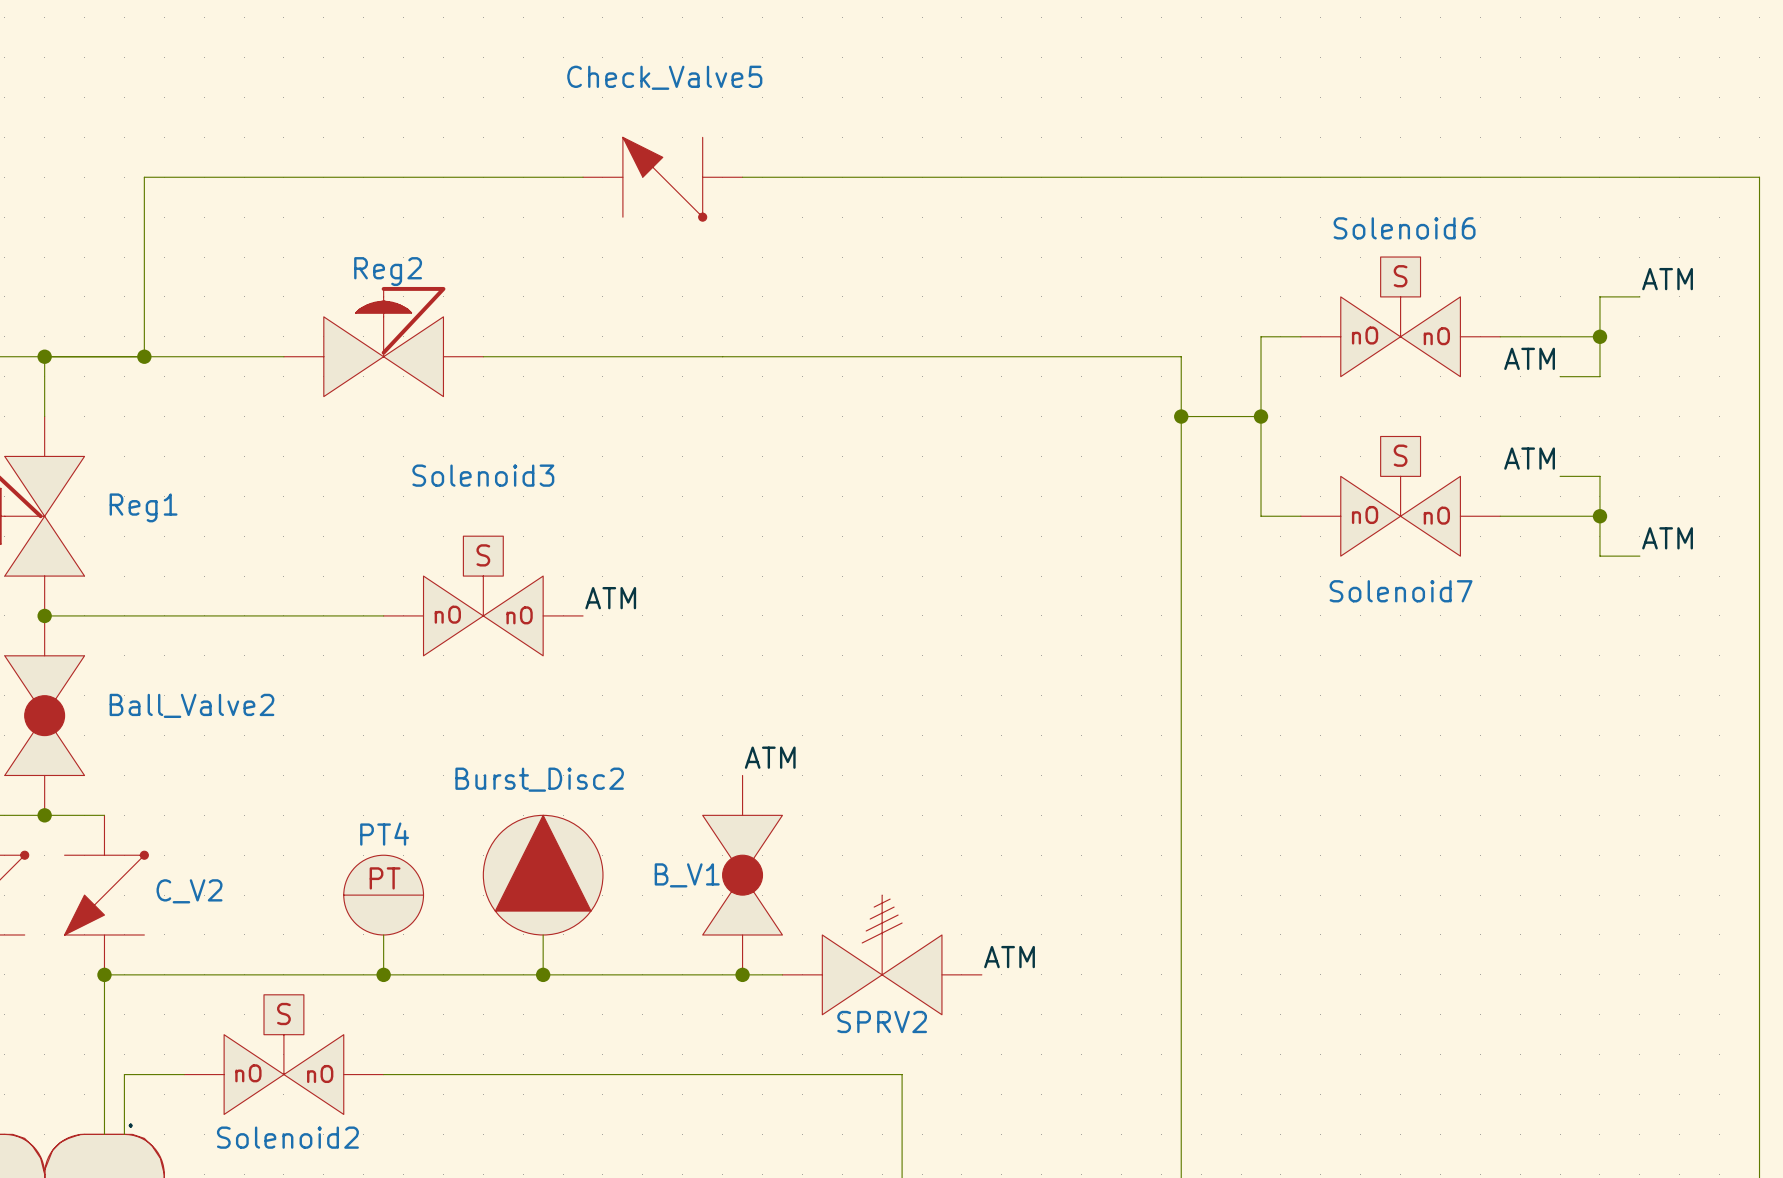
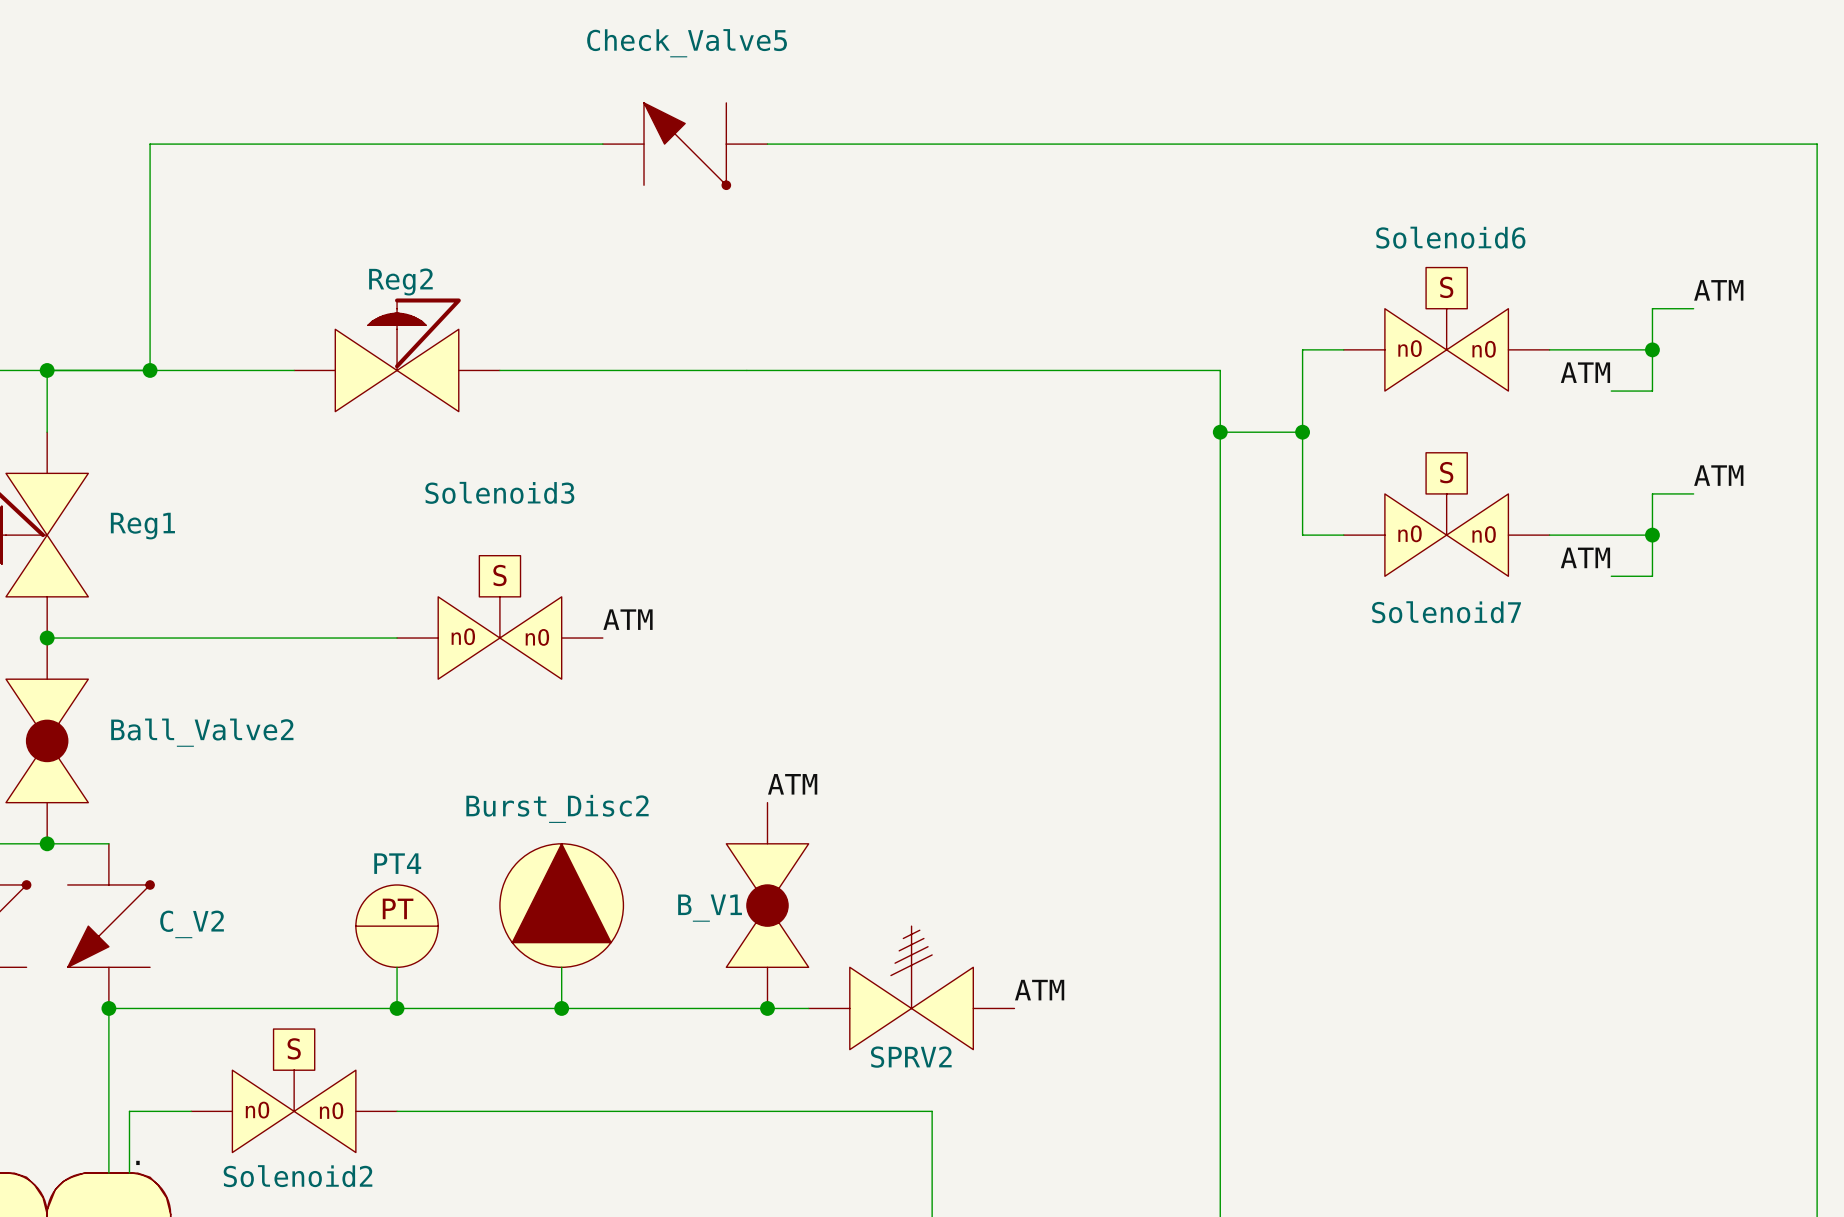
wire: (144, 177) (583, 177) -> (150, 185) (150, 144) (602, 144)
wire: (742, 177) (1759, 177) -> (767, 144) (1817, 144) (1817, 185)
Check_Valve5 position: (662, 179) -> (685, 146)
label: ATM (1529, 458) -> none
label: none -> ATM (1718, 475)
wire: (1560, 476) (1599, 476) -> (1693, 493) (1652, 493)
label: none -> ATM (1585, 557)
label: ATM (1667, 538) -> none
wire: (1599, 556) (1639, 556) -> (1652, 576) (1611, 576)

